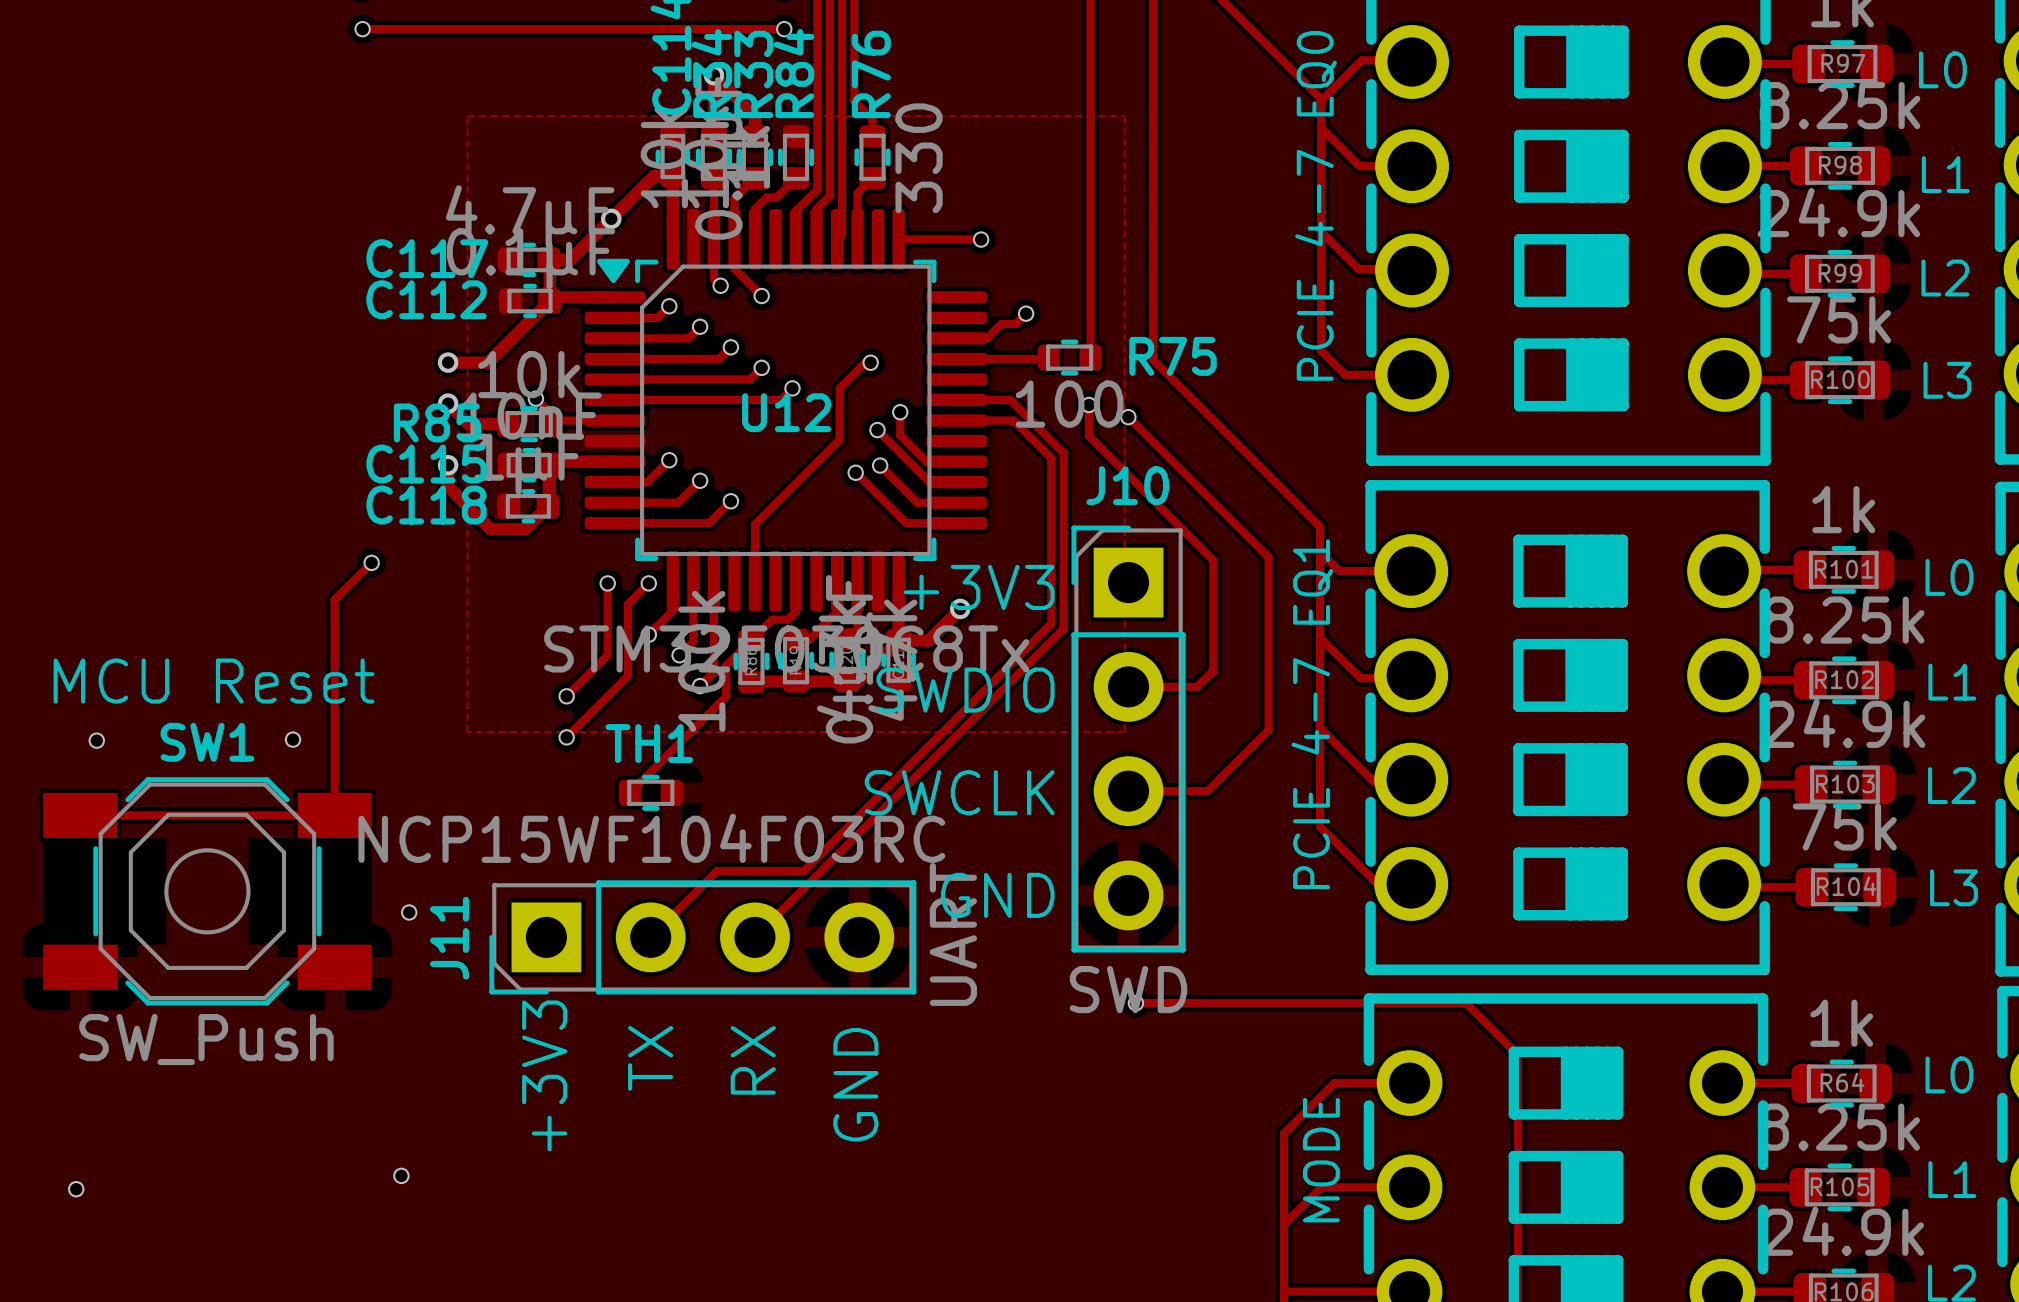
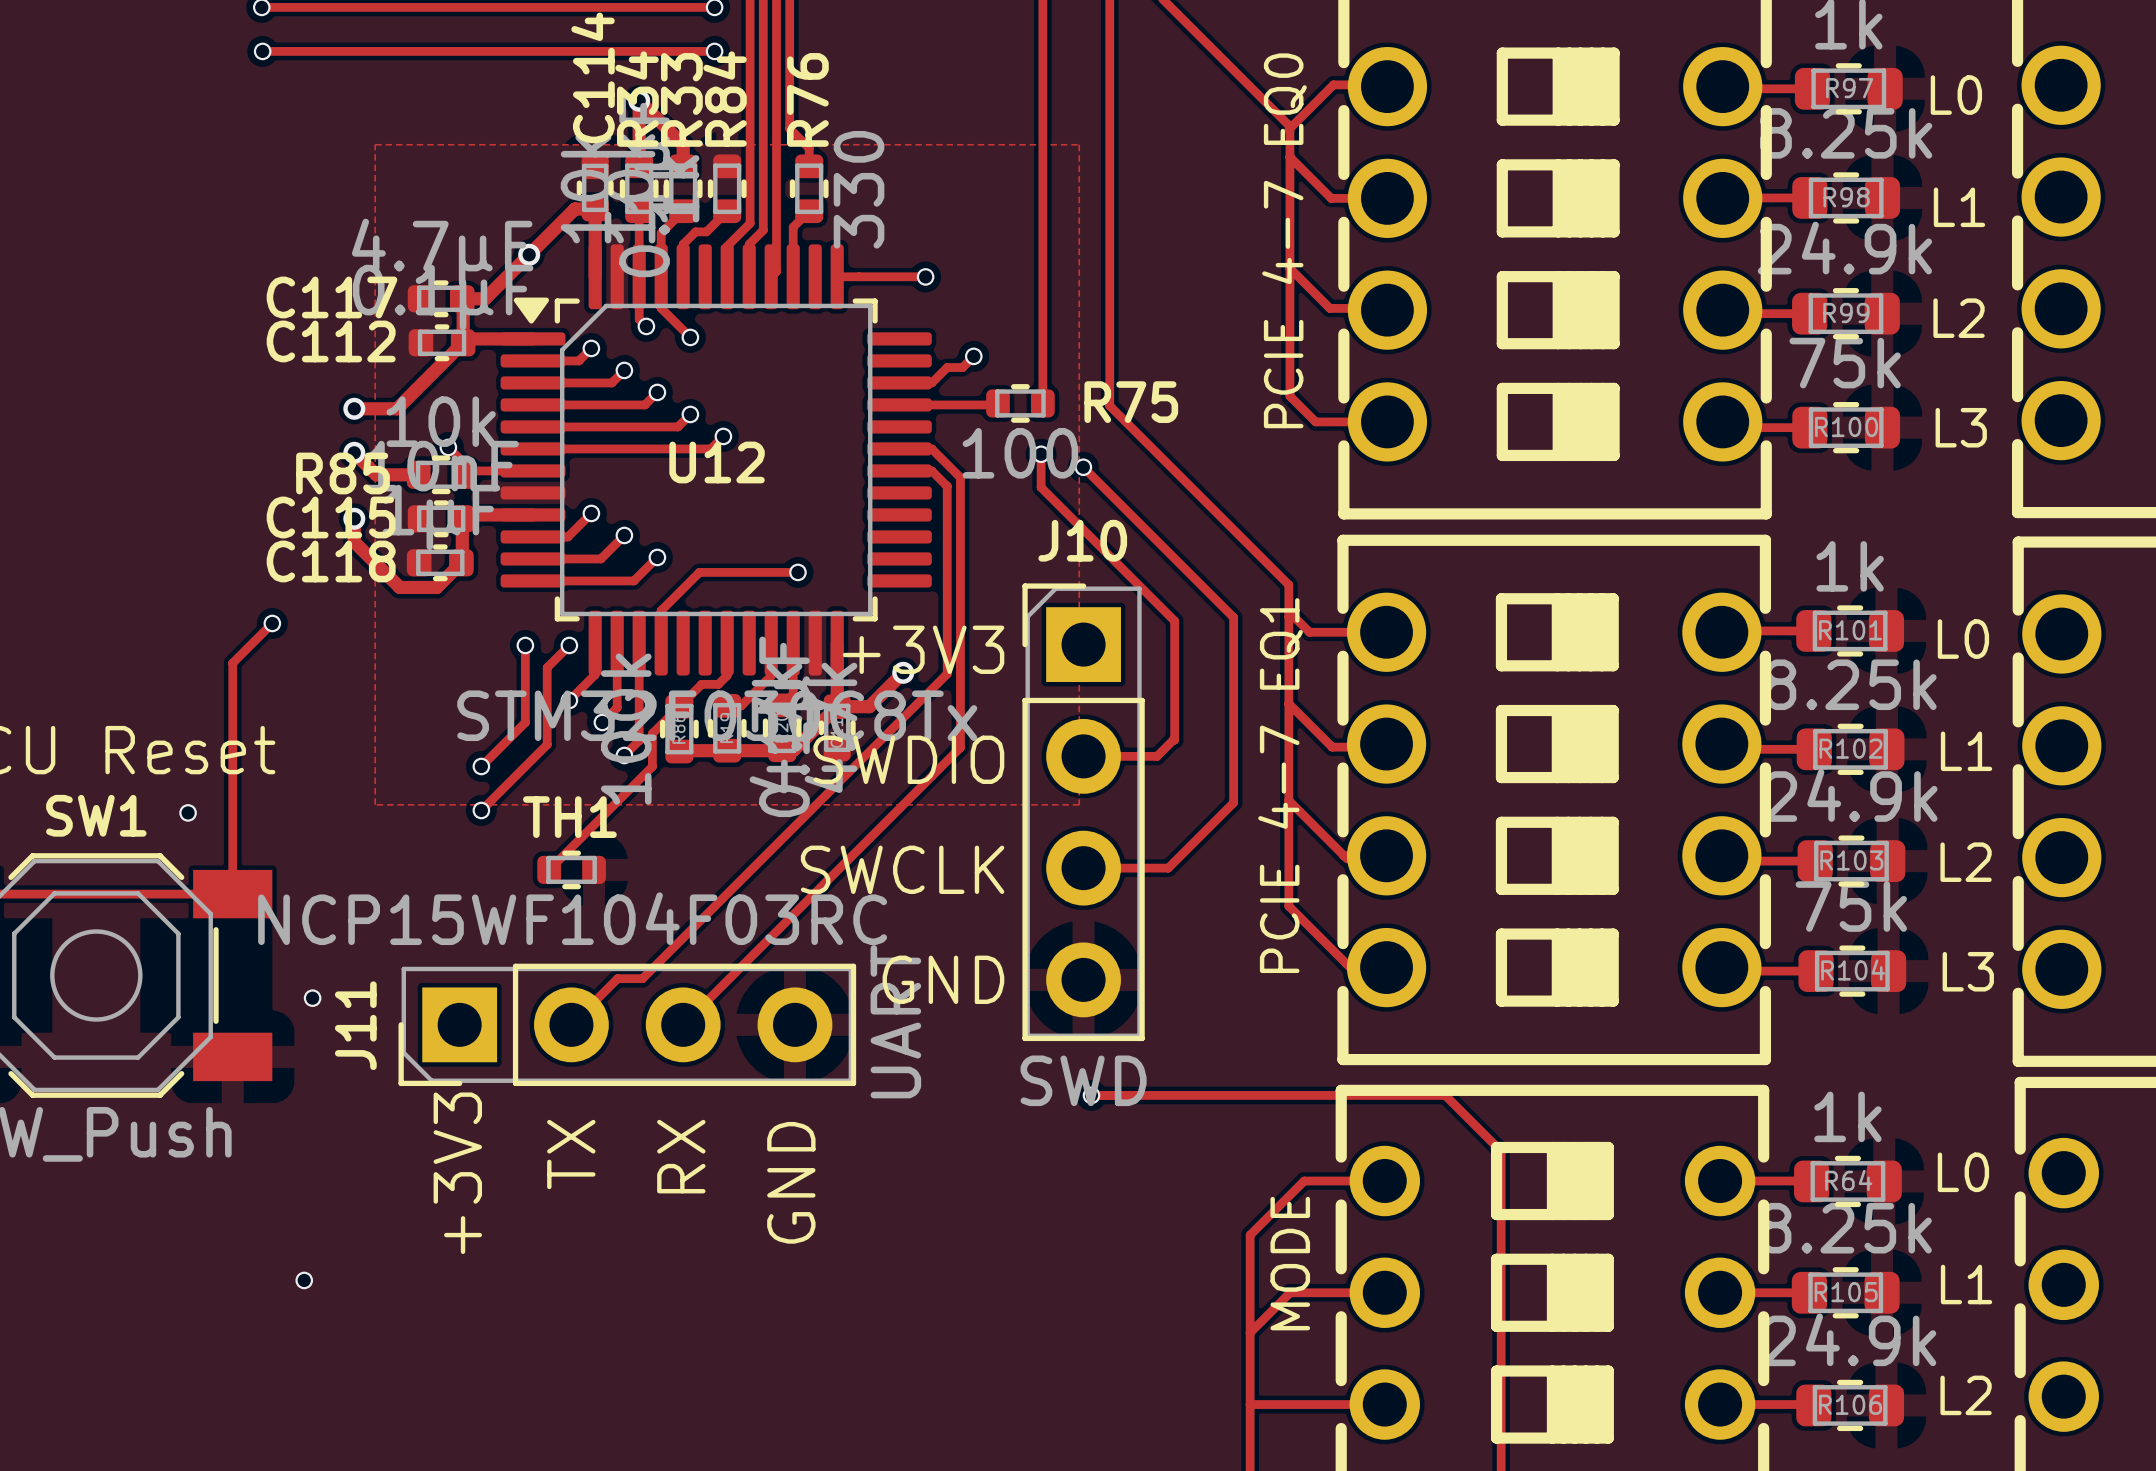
track: (870, 362) (865, 362) (839, 388) (839, 439) (754, 524) (754, 581) -> none
via: (870, 362) -> none
track: (986, 400) (1010, 400) (1063, 453) (1063, 628) (1013, 678) -> (931, 448) (960, 477) (960, 747)
track: (900, 412) (900, 435) (926, 461) (956, 461) -> none
via: (900, 412) -> none
track: (986, 420) (1013, 420) (1051, 458) (1051, 623) (803, 871) (717, 871) (693, 894) -> (931, 470) (947, 486) (947, 673) (642, 978) (617, 978)
track: (877, 430) (929, 482) (956, 482) -> none
via: (877, 430) -> none
track: (880, 465) (917, 502) (956, 502) -> none
via: (880, 465) -> none
track: (855, 472) (906, 523) (956, 523) -> none
via: (855, 472) -> none
track: none -> (797, 572) (699, 572) (661, 610) (661, 643)
via: none -> (797, 572)

